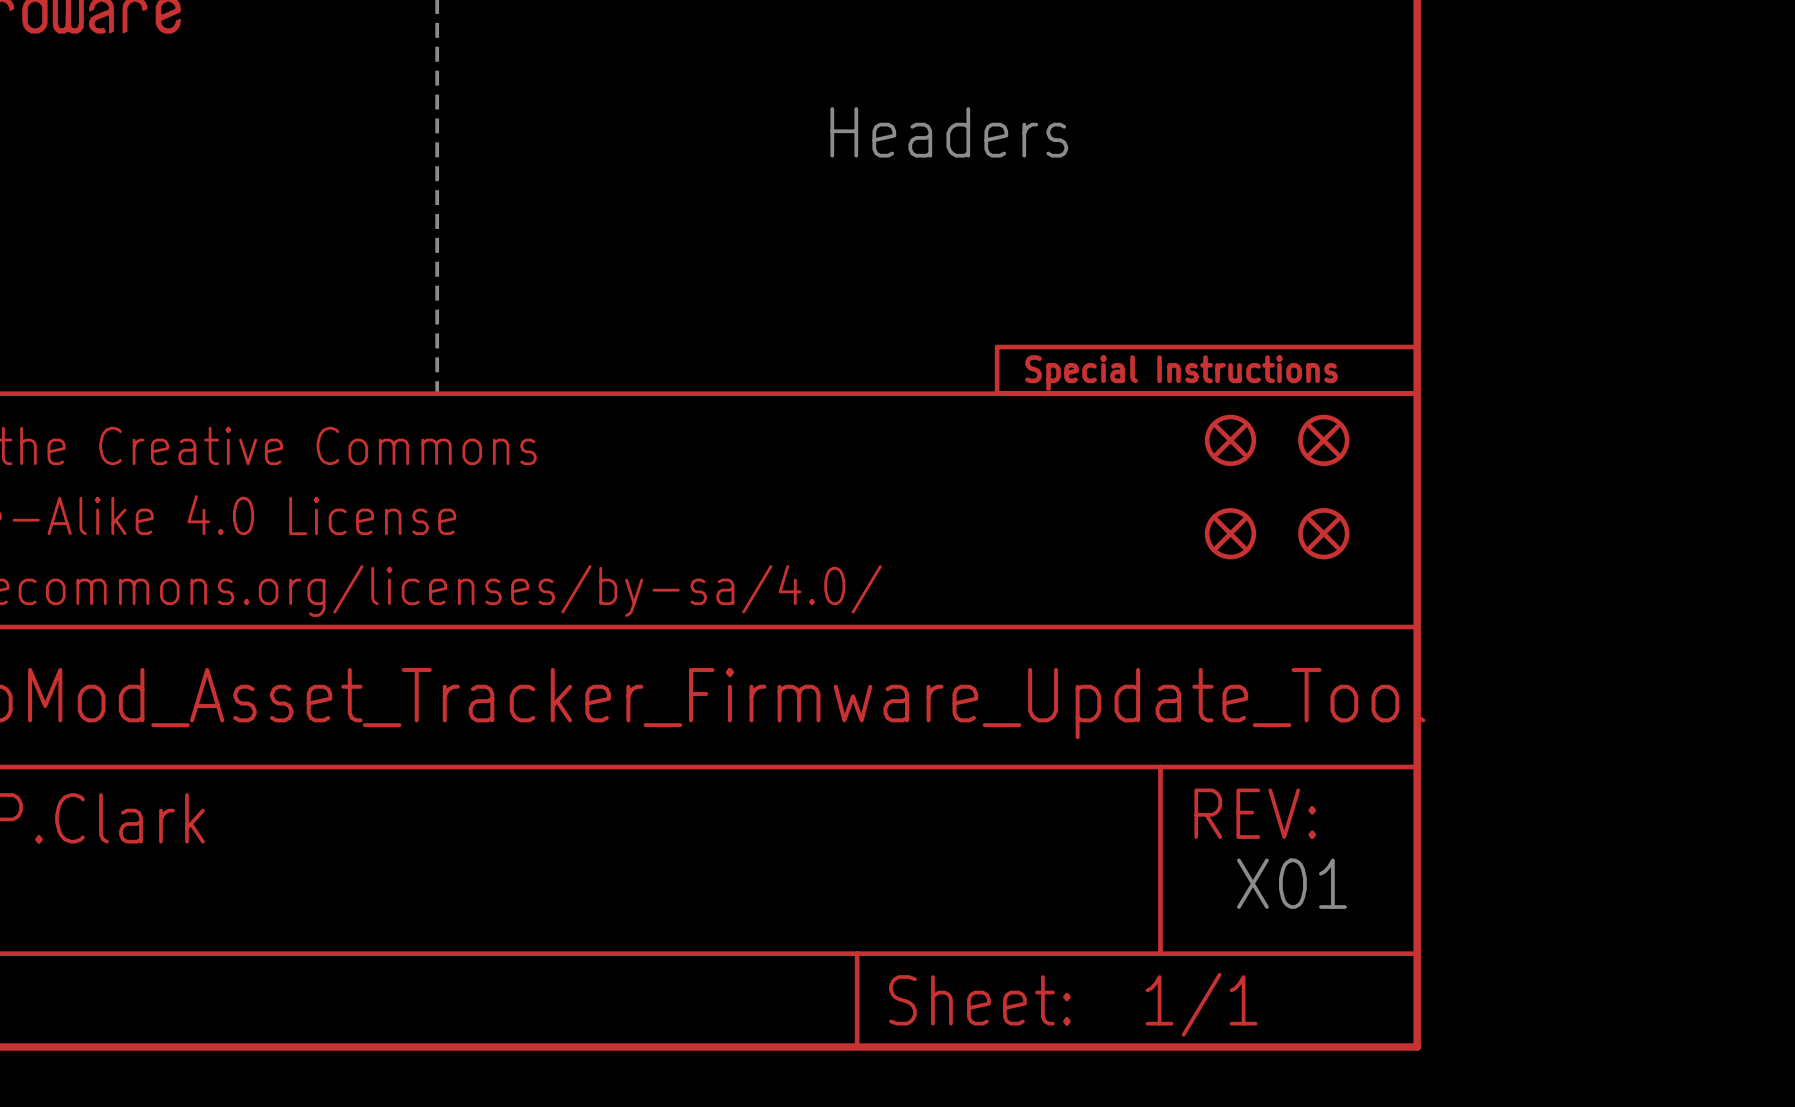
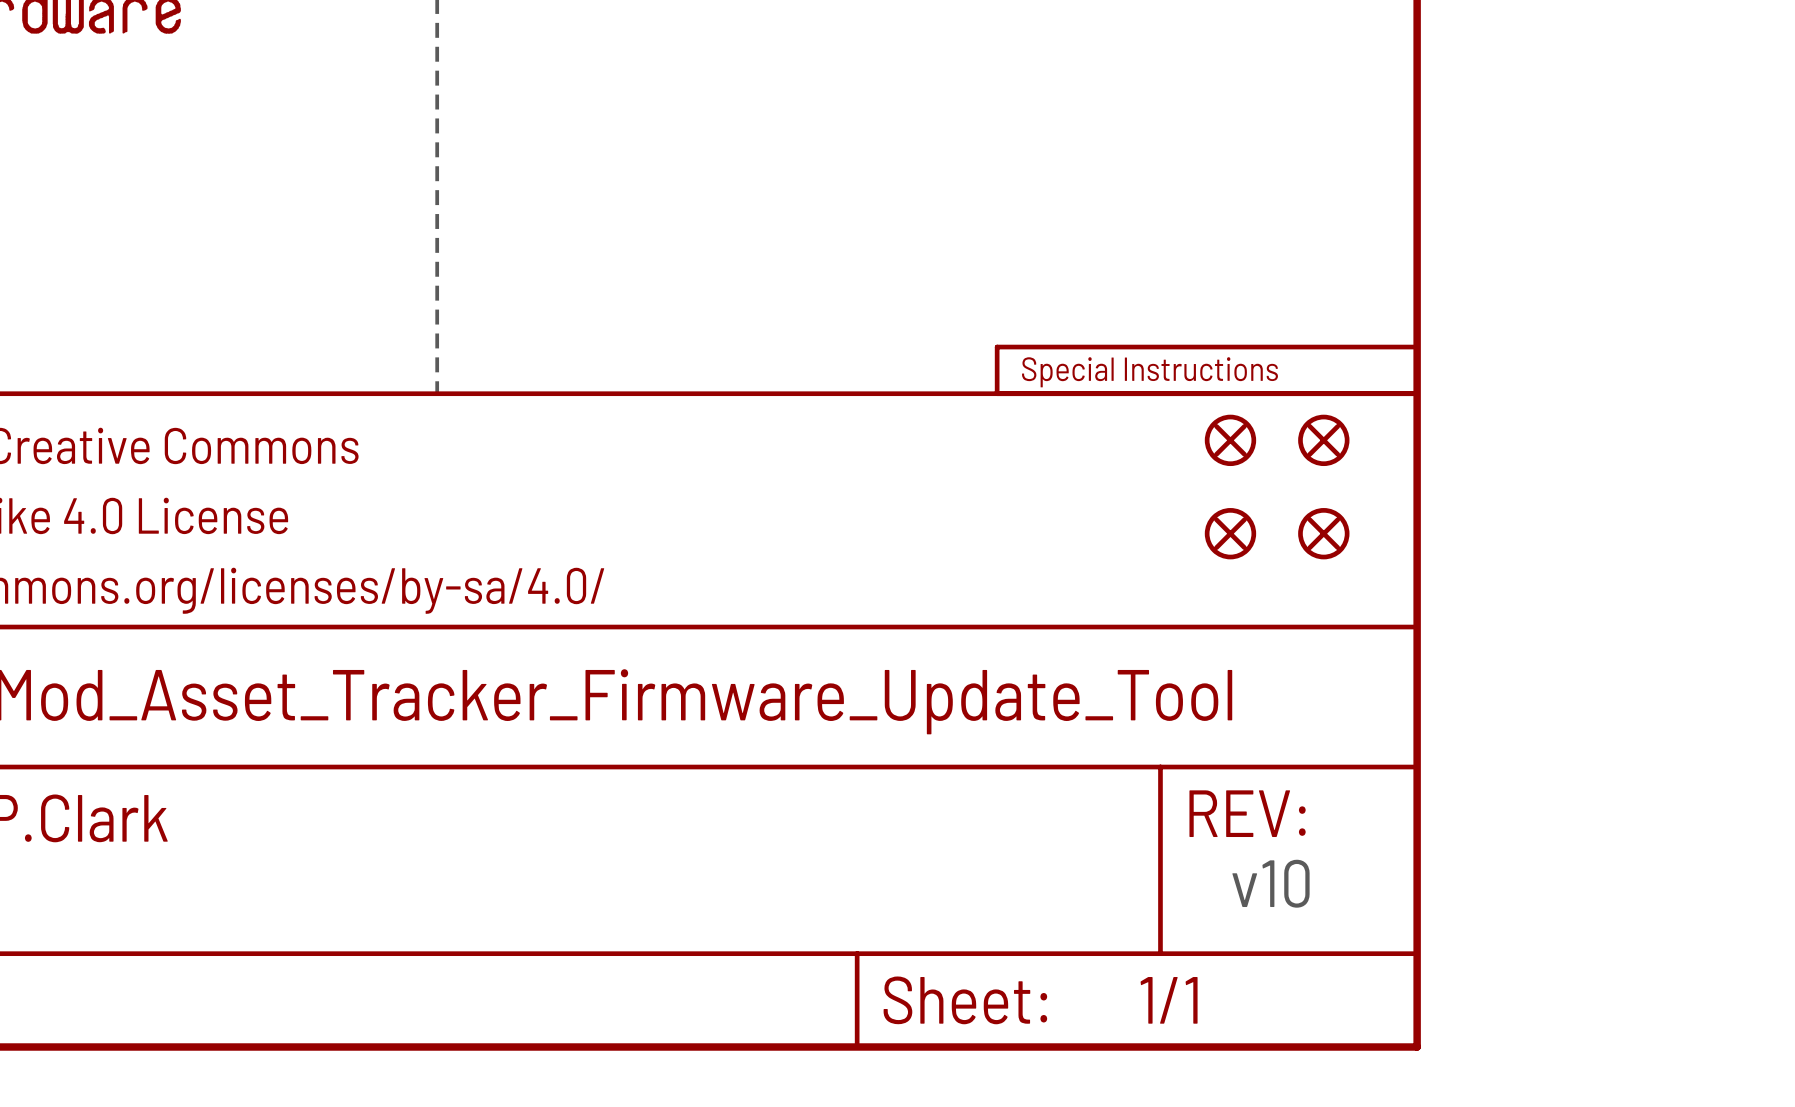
text: Headers (949, 132) -> none
text: X01 (1291, 883) -> v10 (1271, 883)

